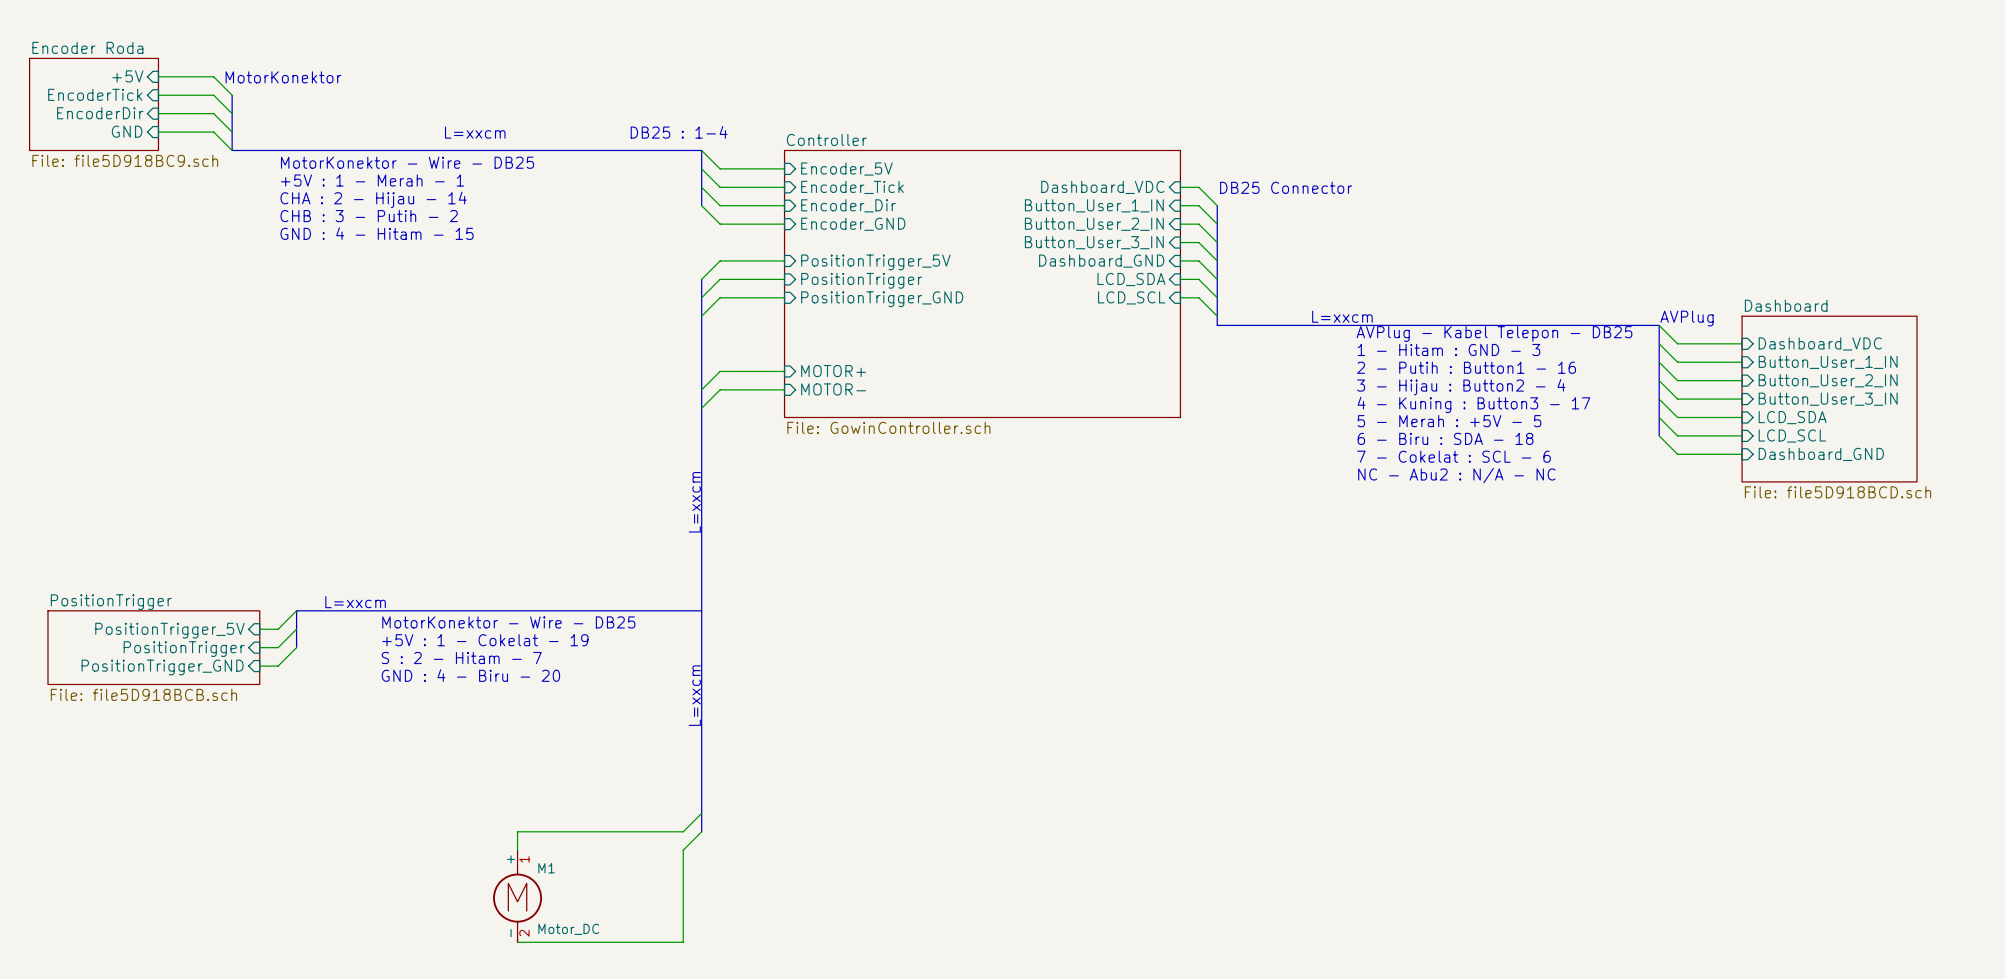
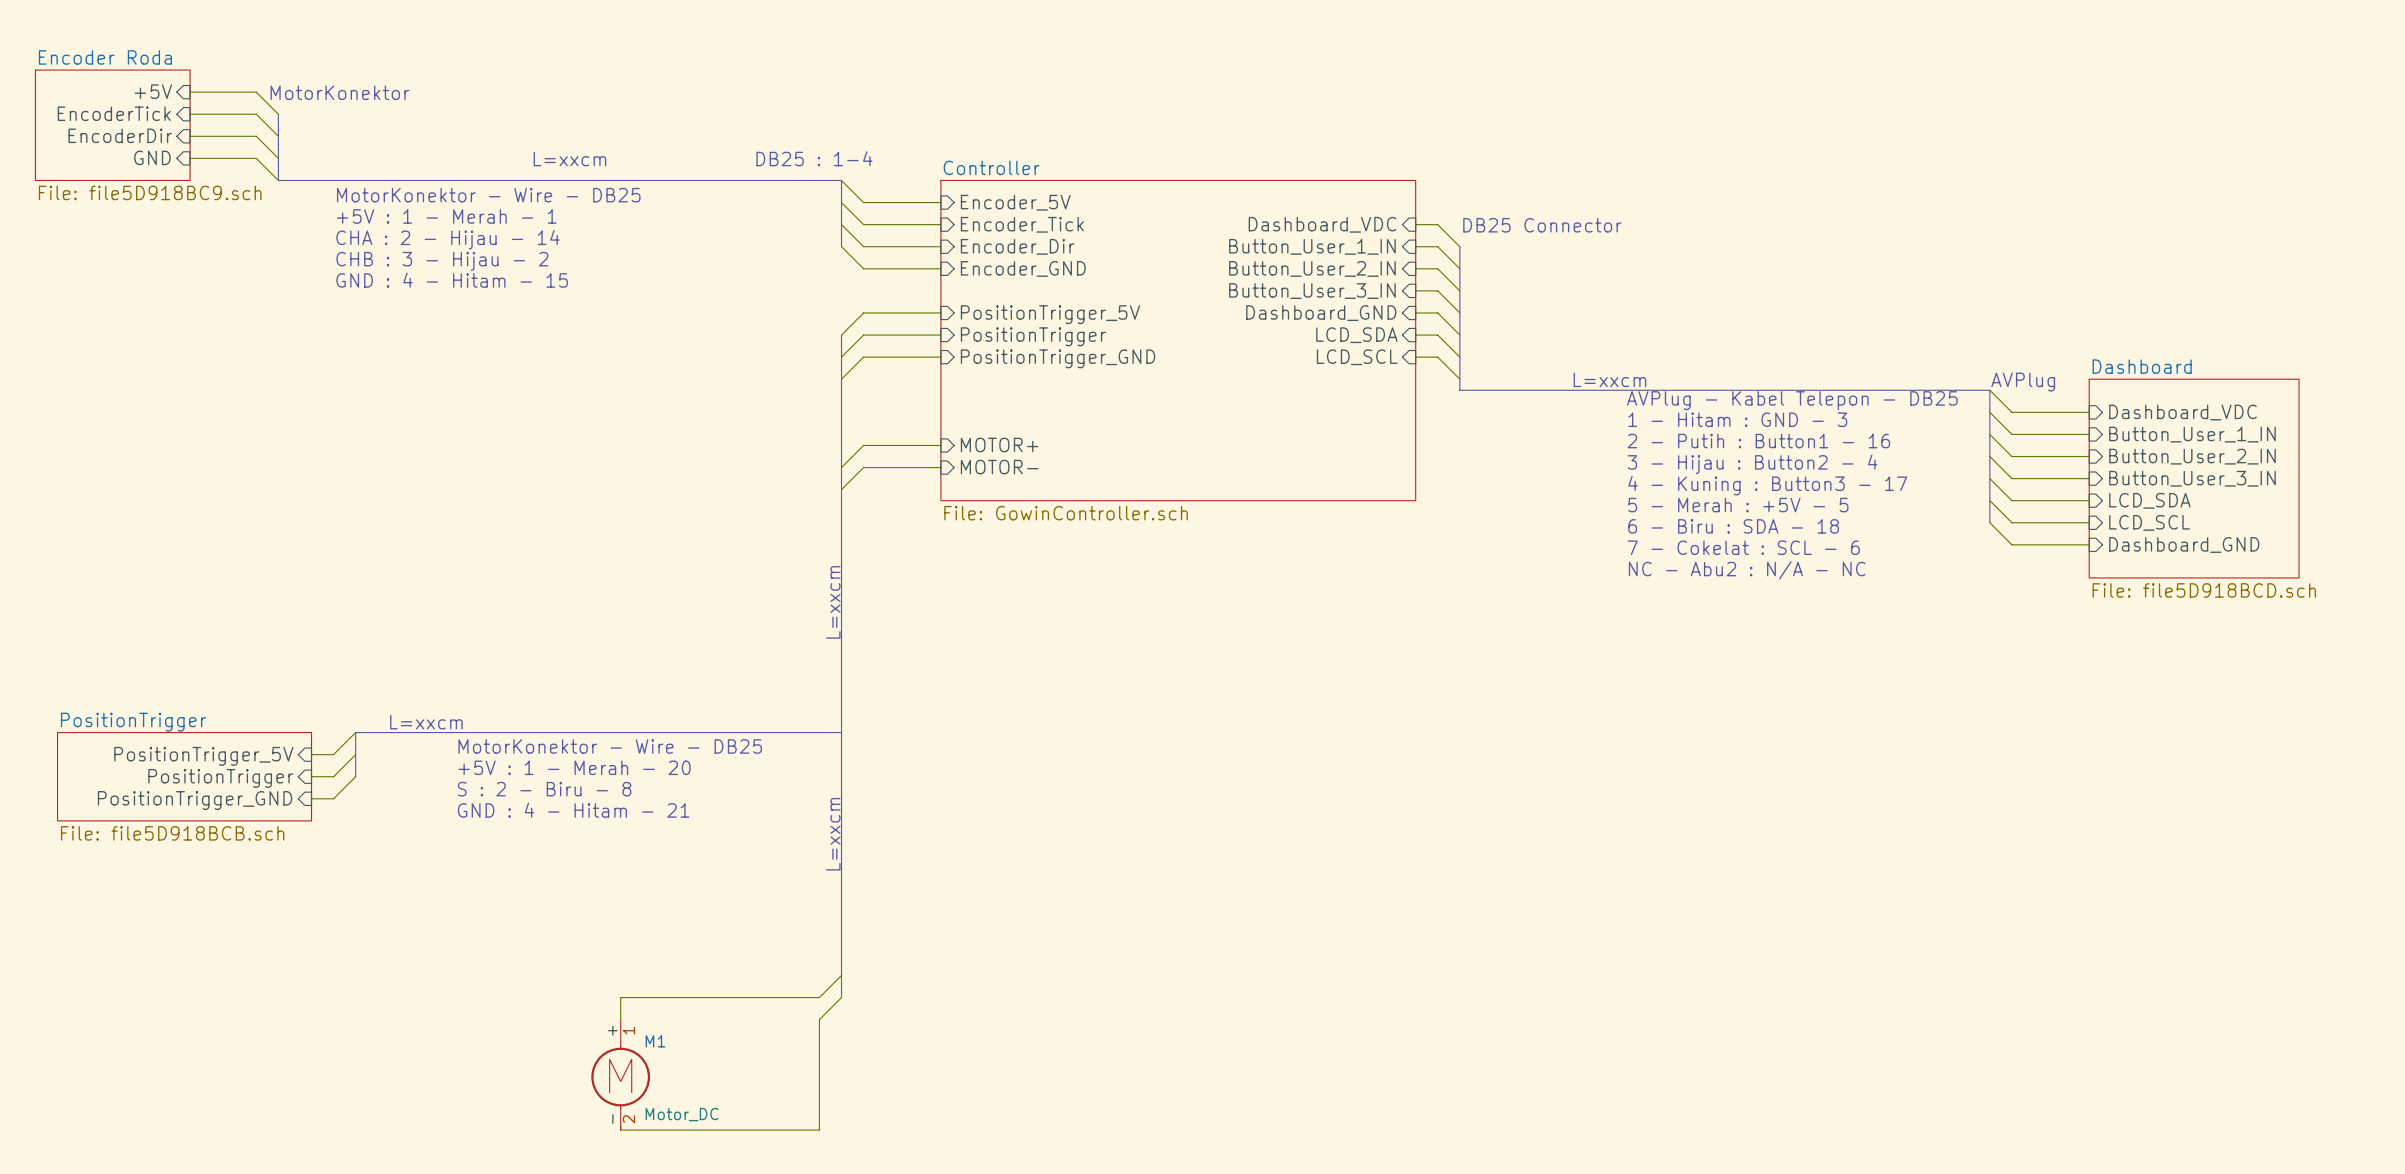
text: CHB : 3 - Putih - 2 (369, 216) -> CHB : 3 - Hijau - 2 (442, 261)
text: +5V : 1 - Cokelat - 19 (485, 640) -> +5V : 1 - Merah - 20 (574, 767)
text: S : 2 - Hitam - 7 (461, 658) -> S : 2 - Biru - 8 (544, 789)
text: GND : 4 - Biru - 20 (470, 675) -> GND : 4 - Hitam - 21 (573, 810)

